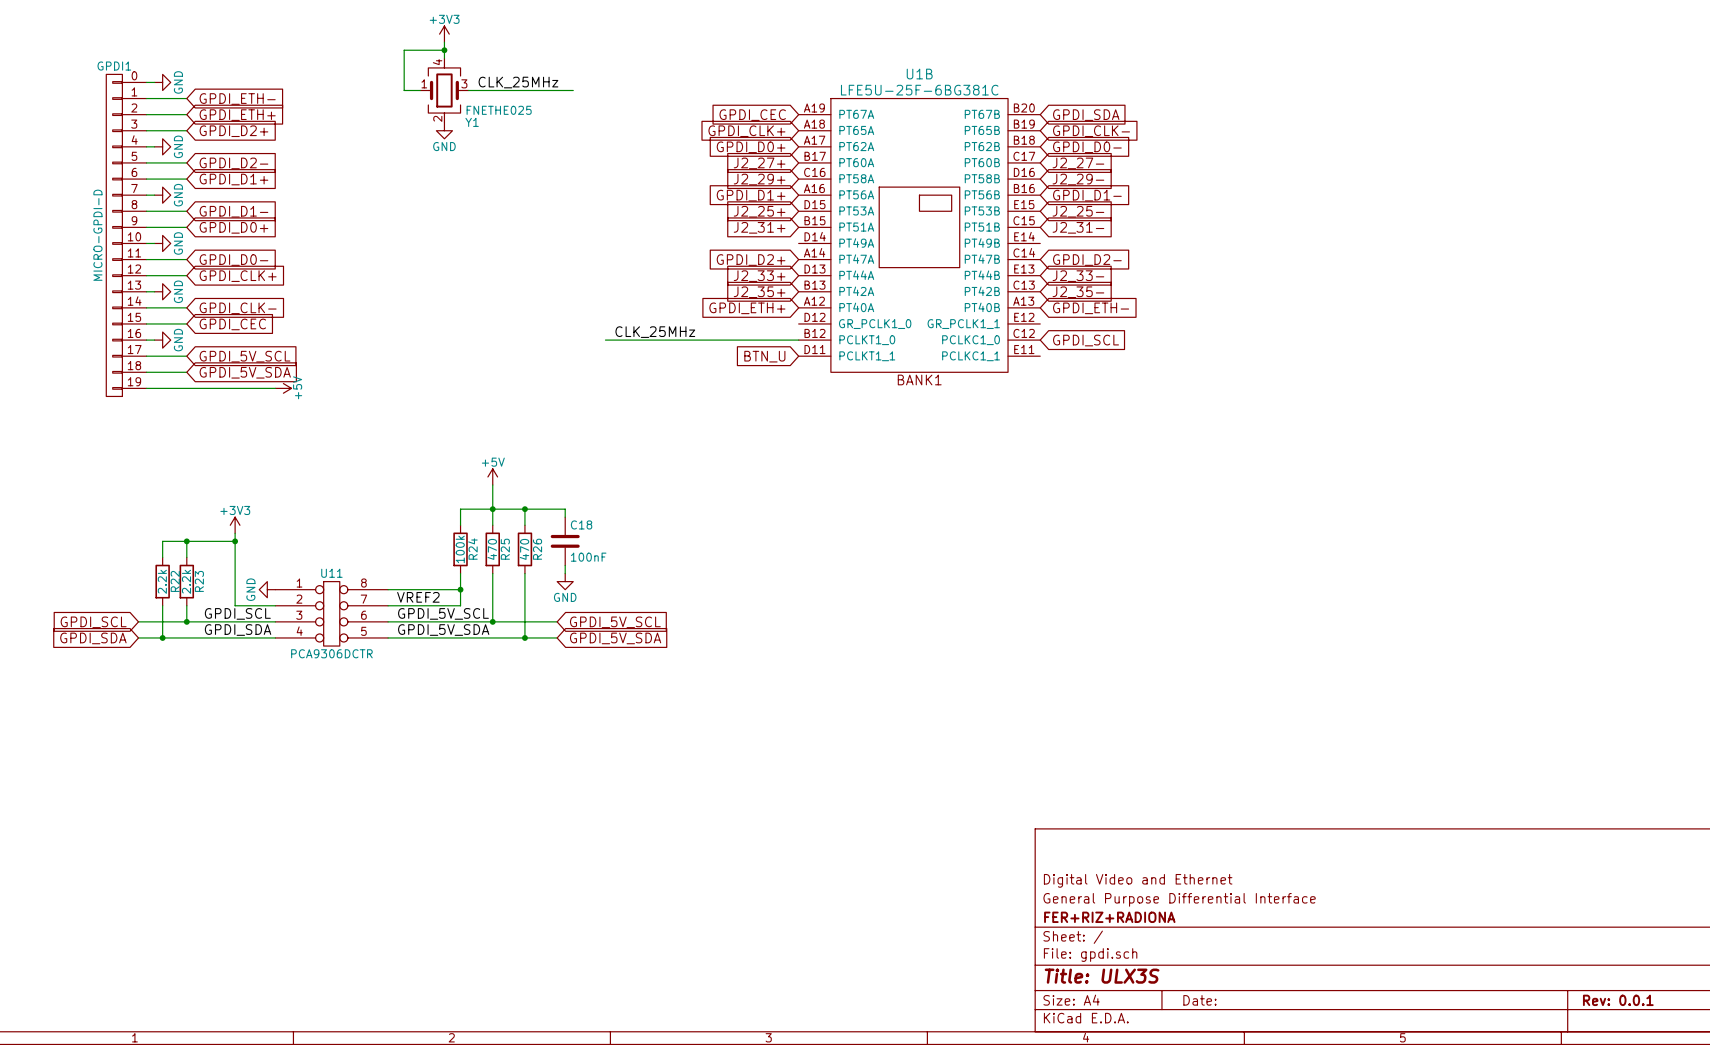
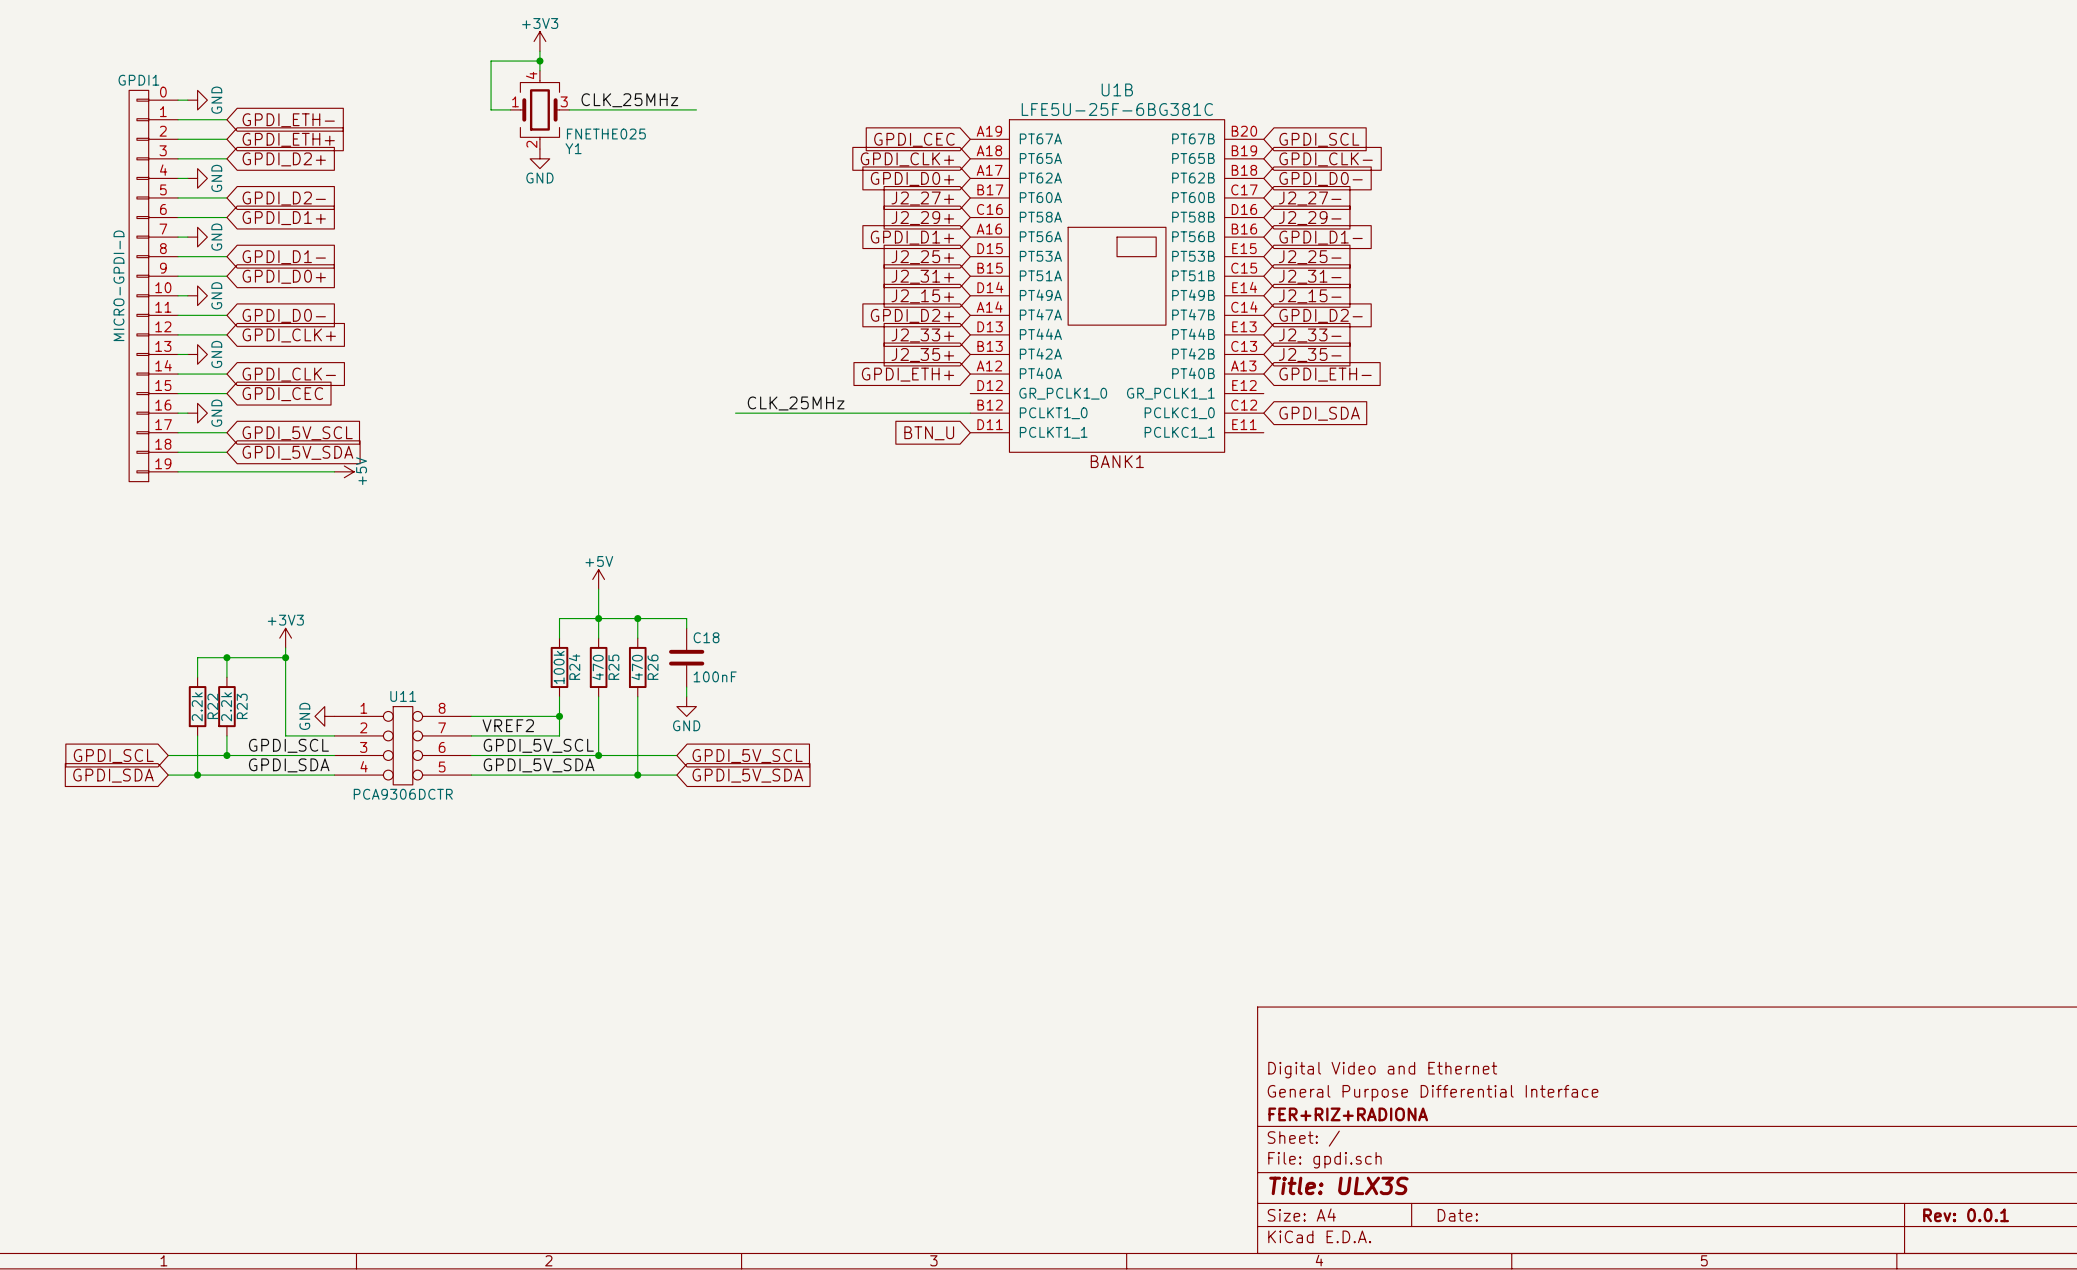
global label: GPDI_SDA (1086, 115) -> GPDI_SCL (1319, 139)
global label: none -> J2_15+ (922, 296)
global label: none -> J2_15- (1310, 296)
global label: GPDI_SCL (1086, 340) -> GPDI_SDA (1319, 413)

